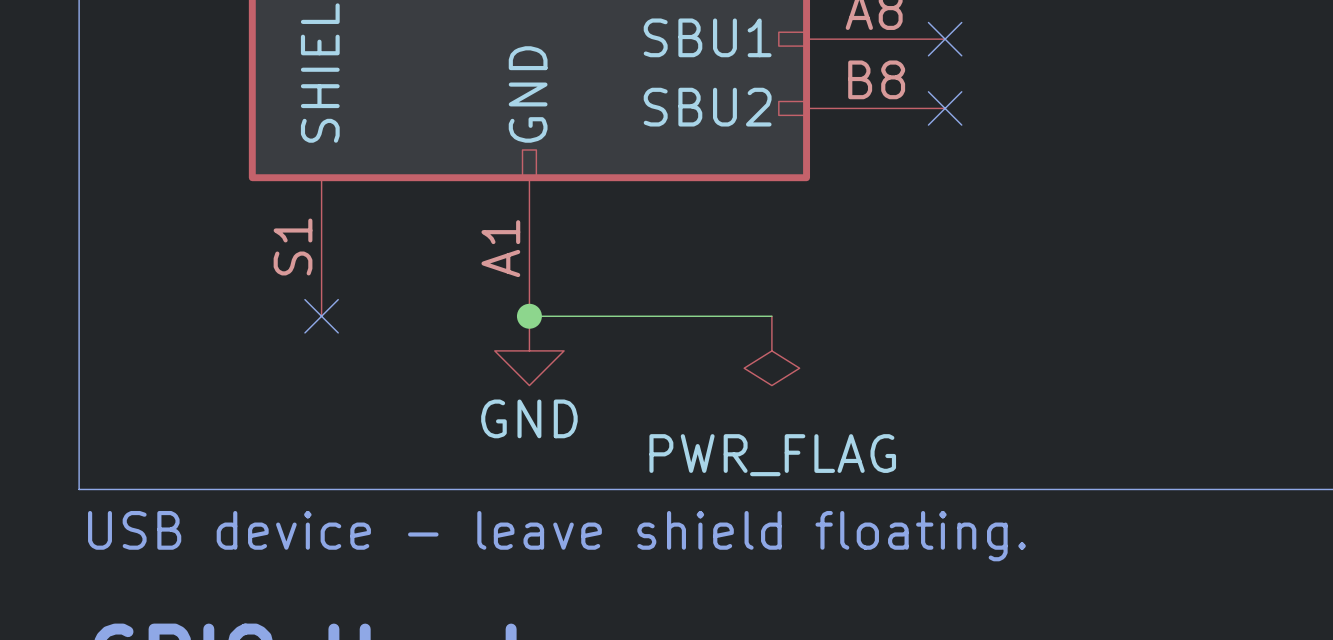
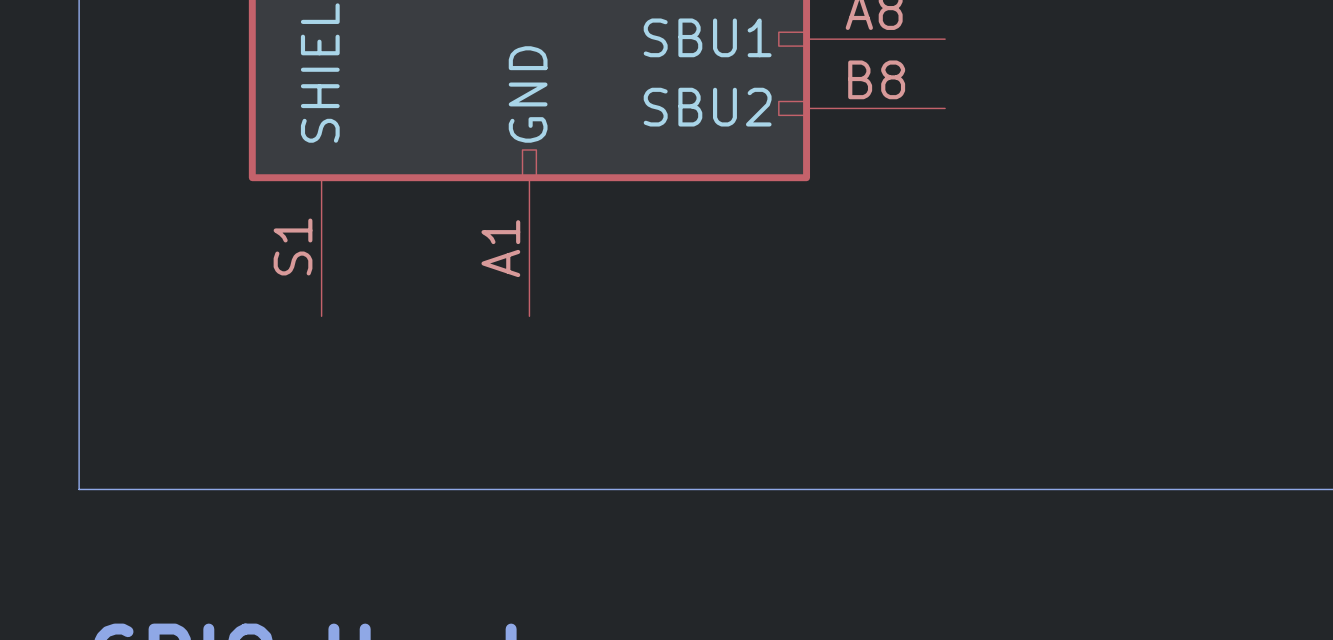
no-connect mark: (945, 39) -> none
no-connect mark: (945, 108) -> none
no-connect mark: (321, 316) -> none
wire: (529, 316) (771, 316) -> none
junction: (529, 316) -> none
power symbol: GND (529, 350) -> none
power symbol: PWR_FLAG (771, 350) -> none
text: USB device - leave shield floating. (556, 536) -> none

